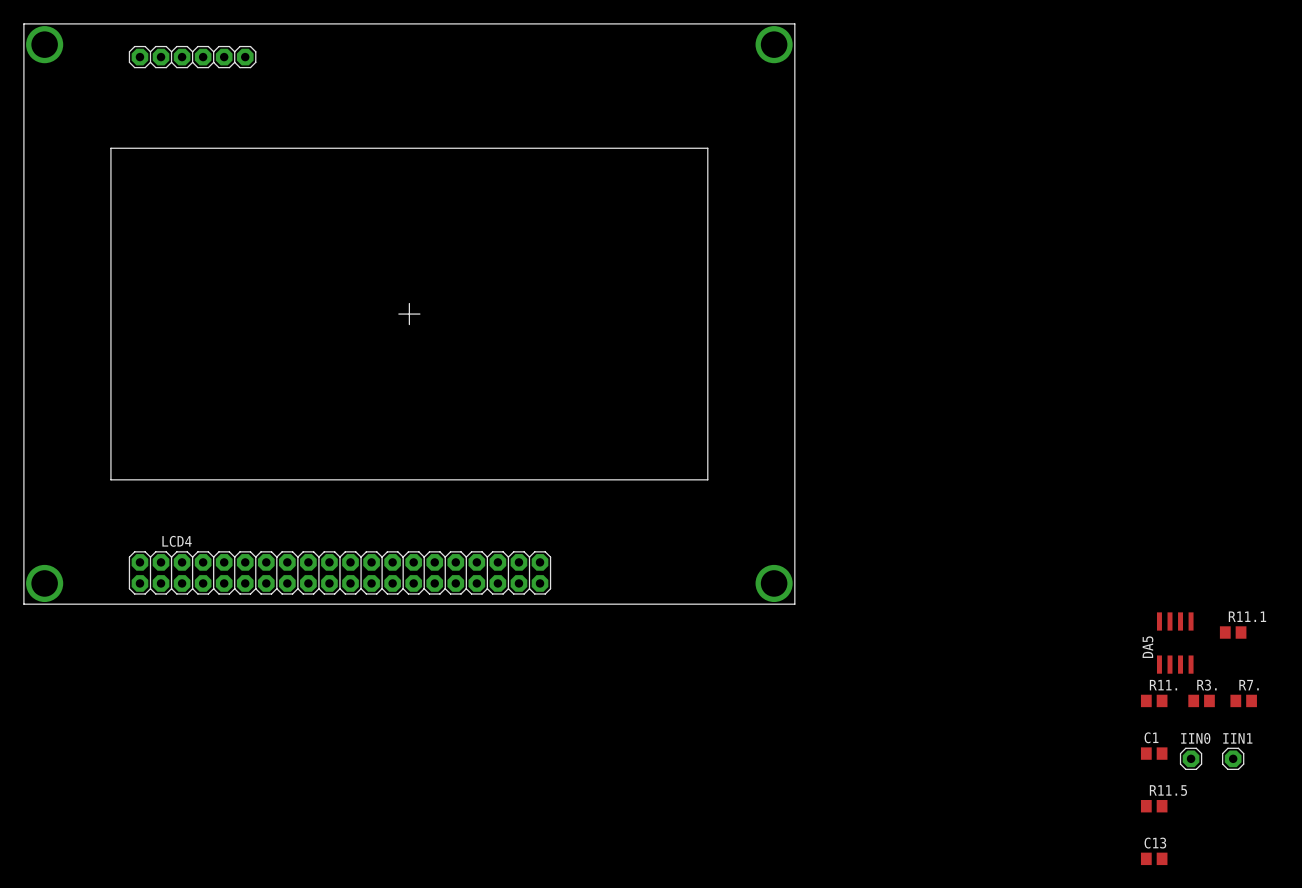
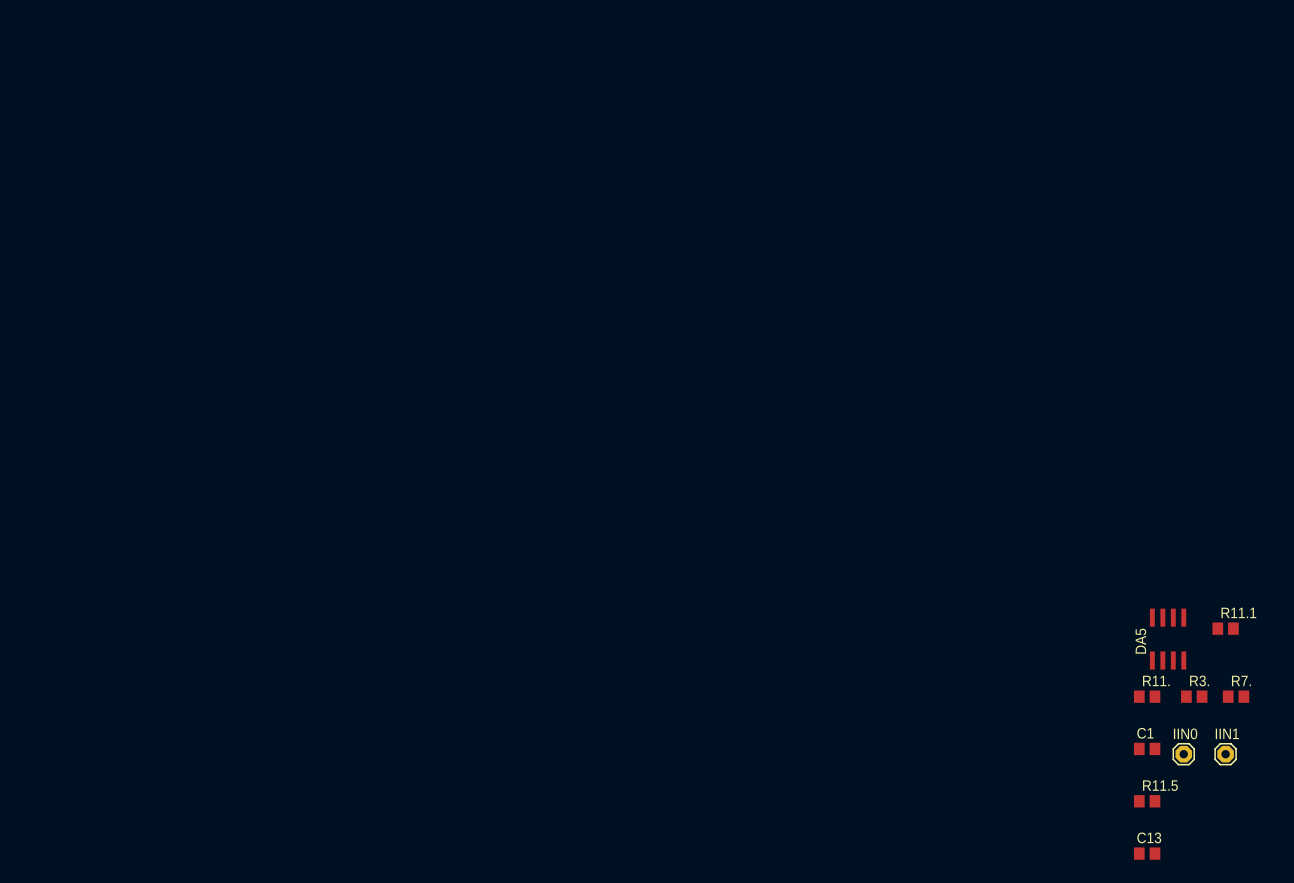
LCD4: (409, 314) -> none

